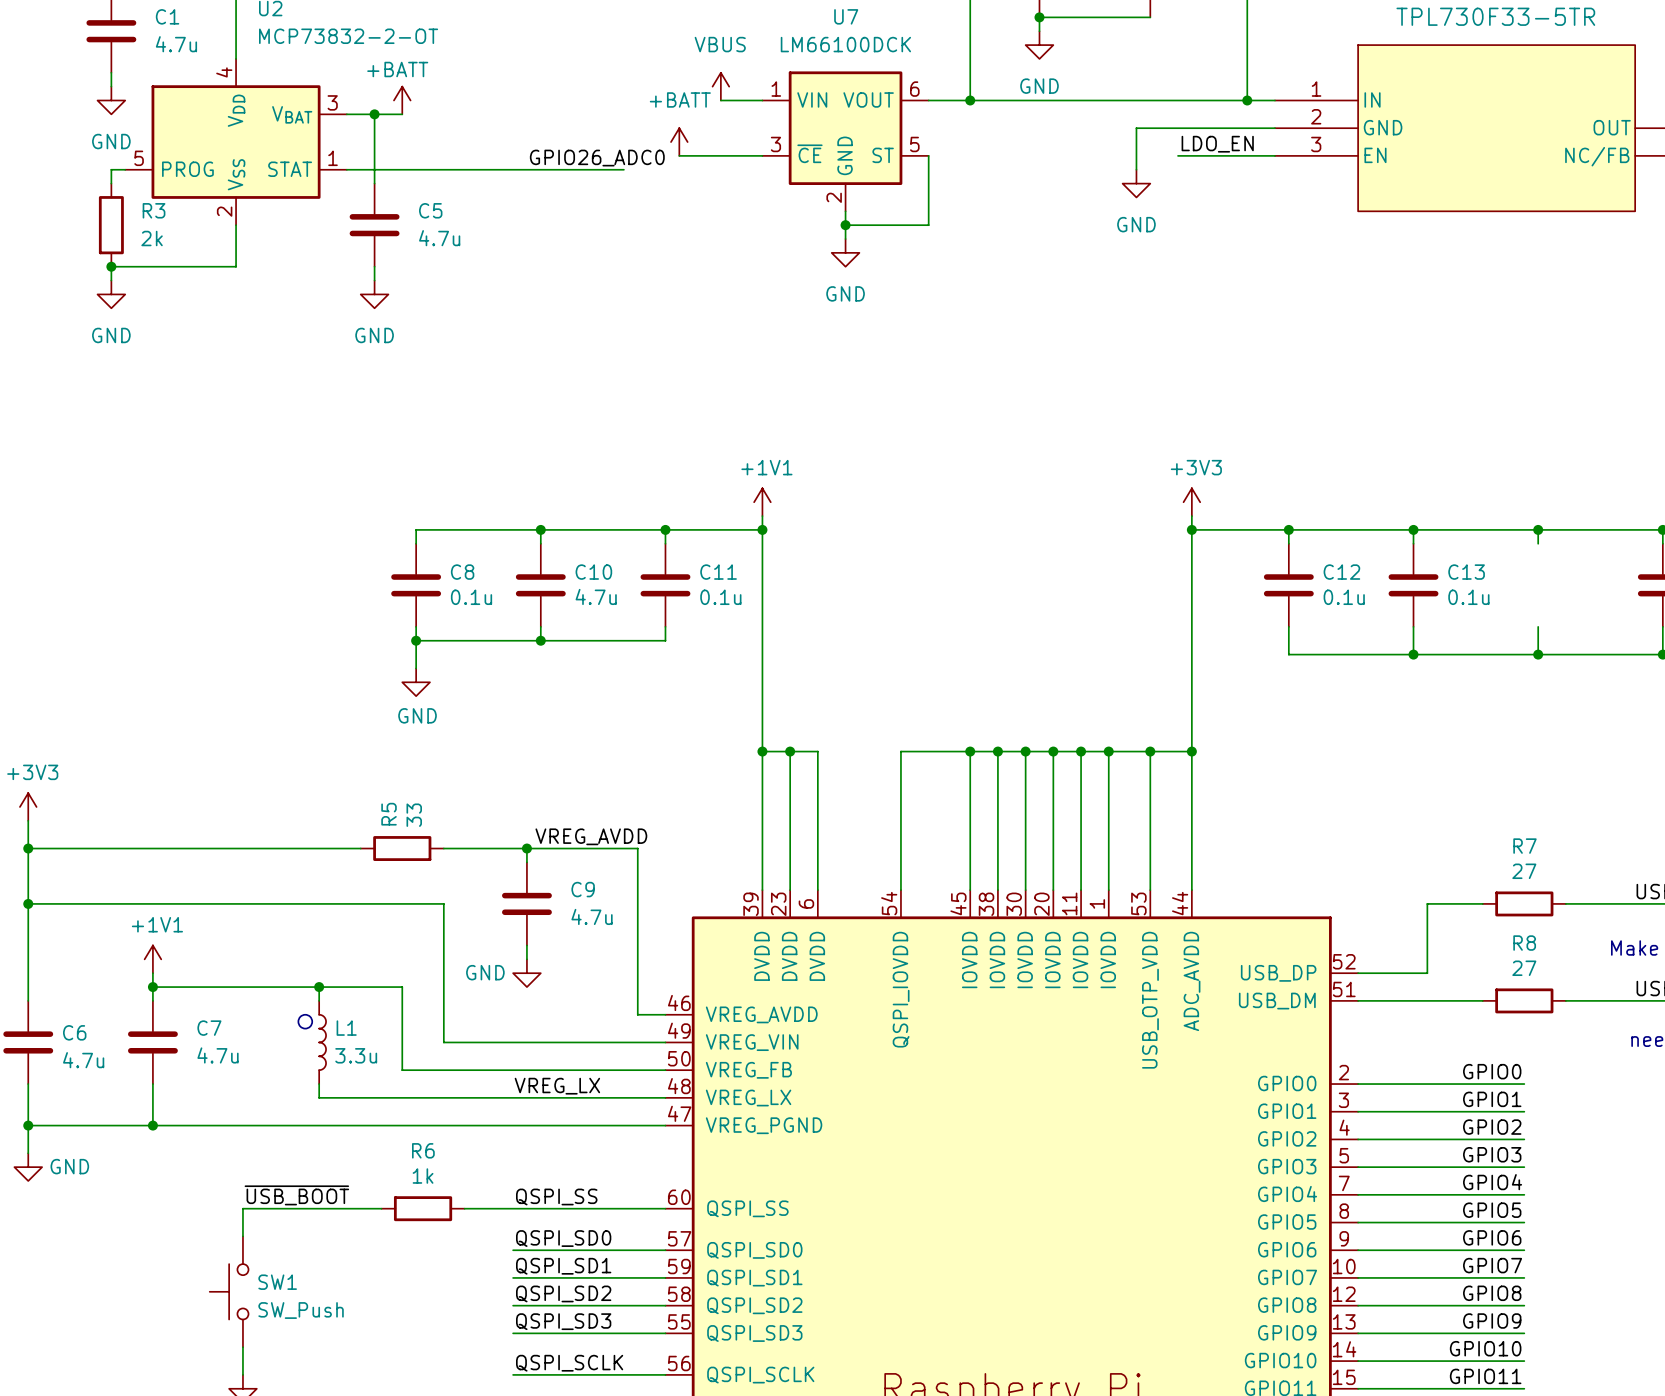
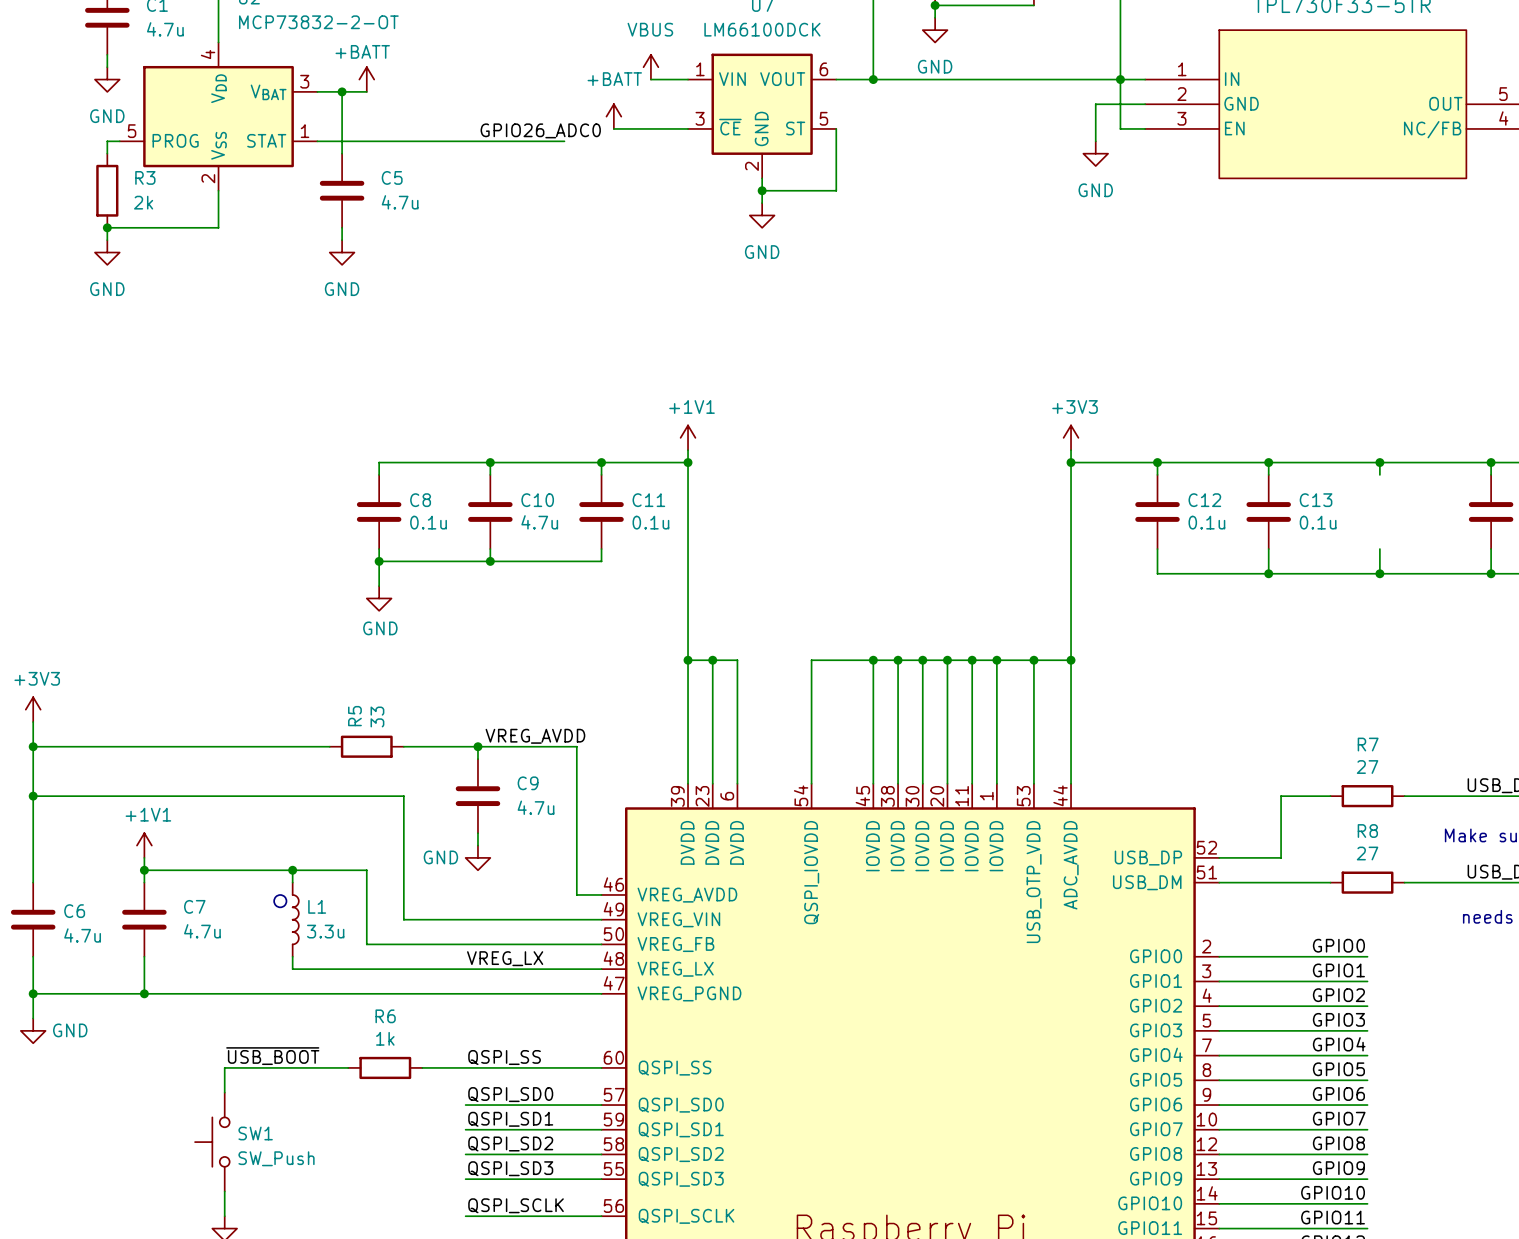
wire: (1219, 128) (1136, 128) (1136, 169) -> (1095, 104) (1095, 141)
label: LDO_EN (1217, 144) -> none
wire: (1178, 155) (1247, 155) -> (1120, 79) (1120, 128)
power symbol position: GND (1136, 183) -> GND (1095, 153)

